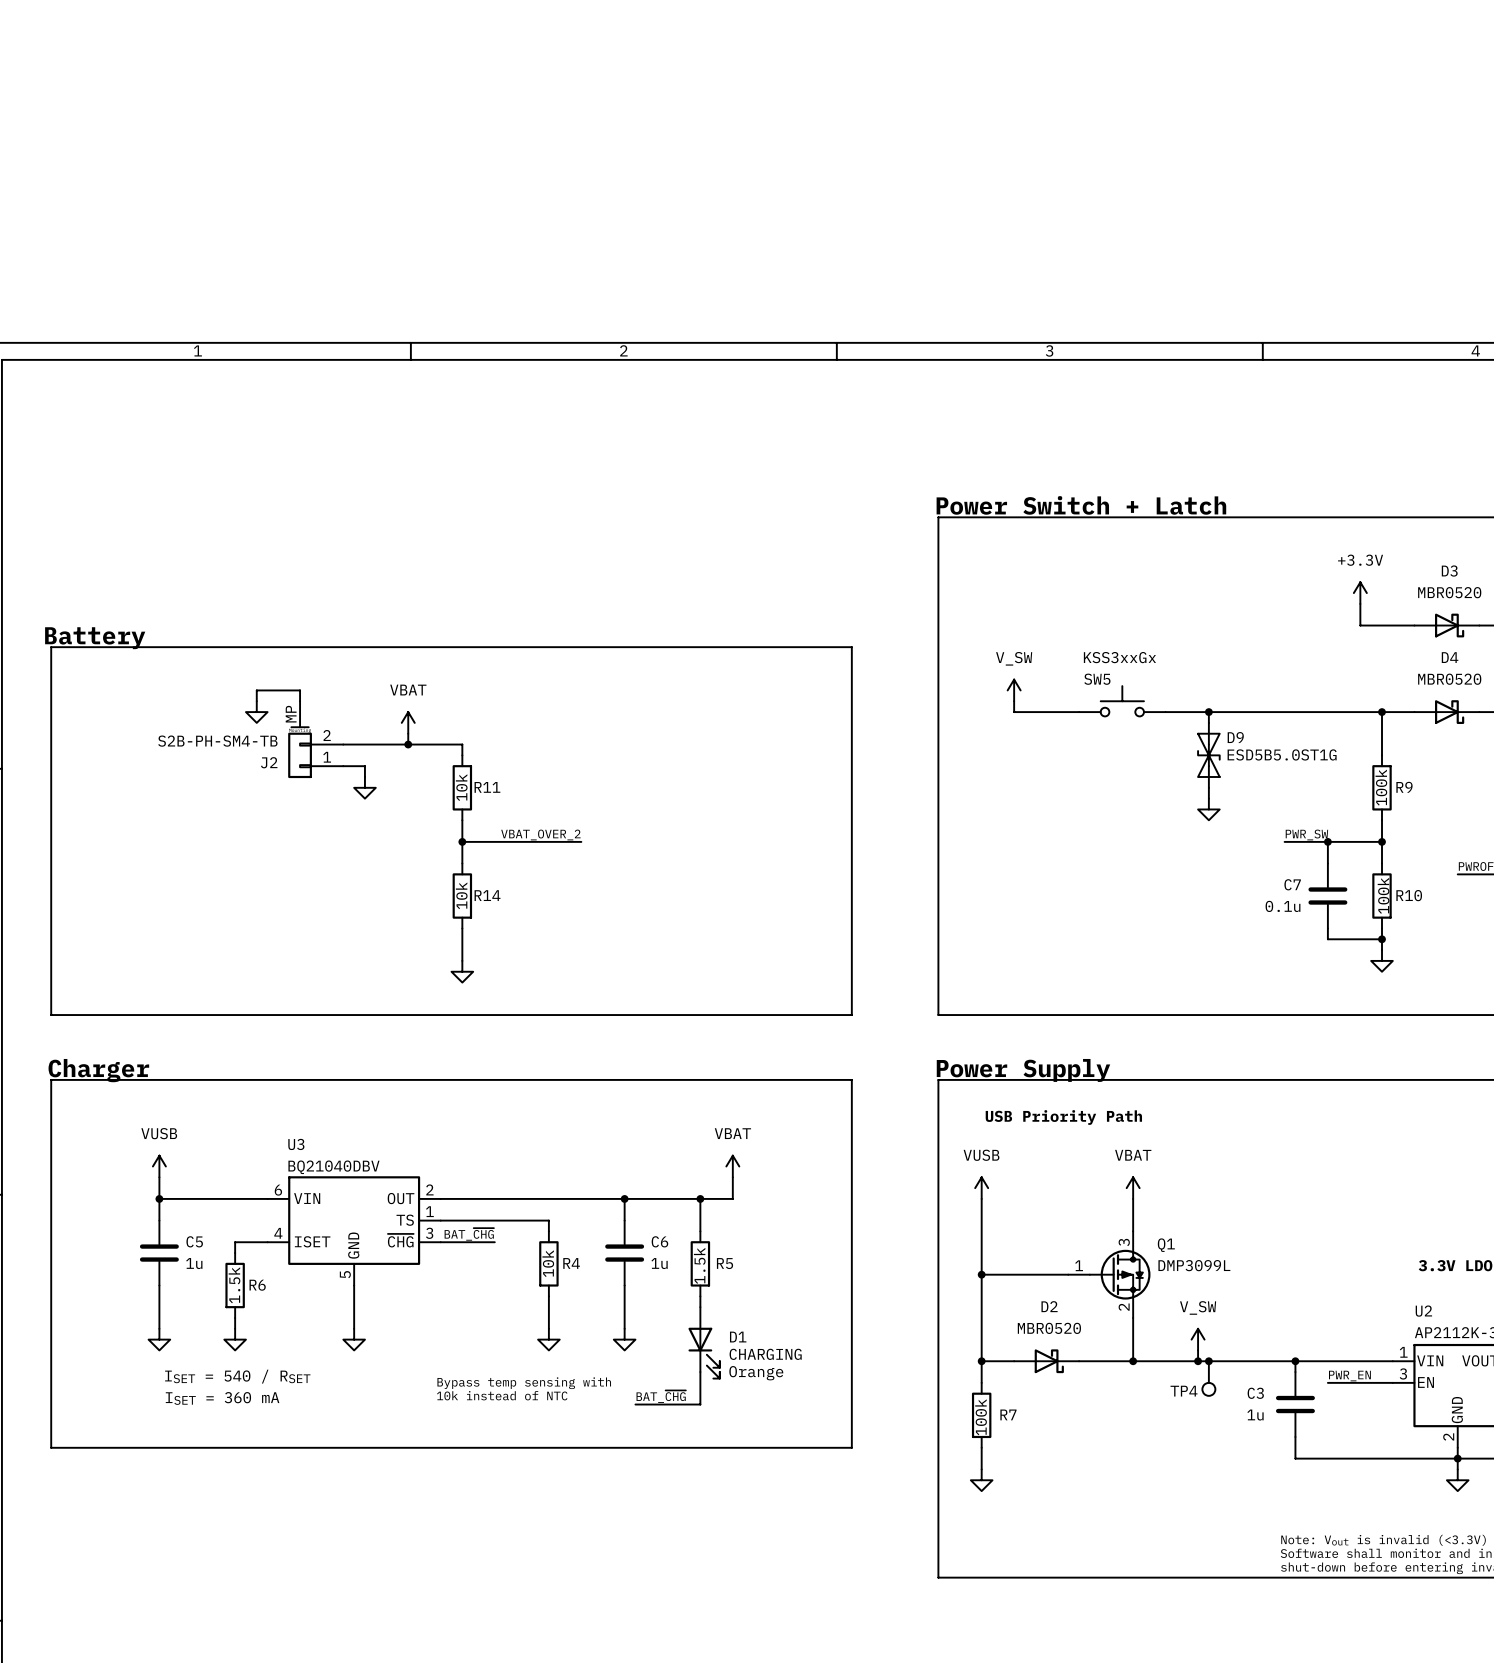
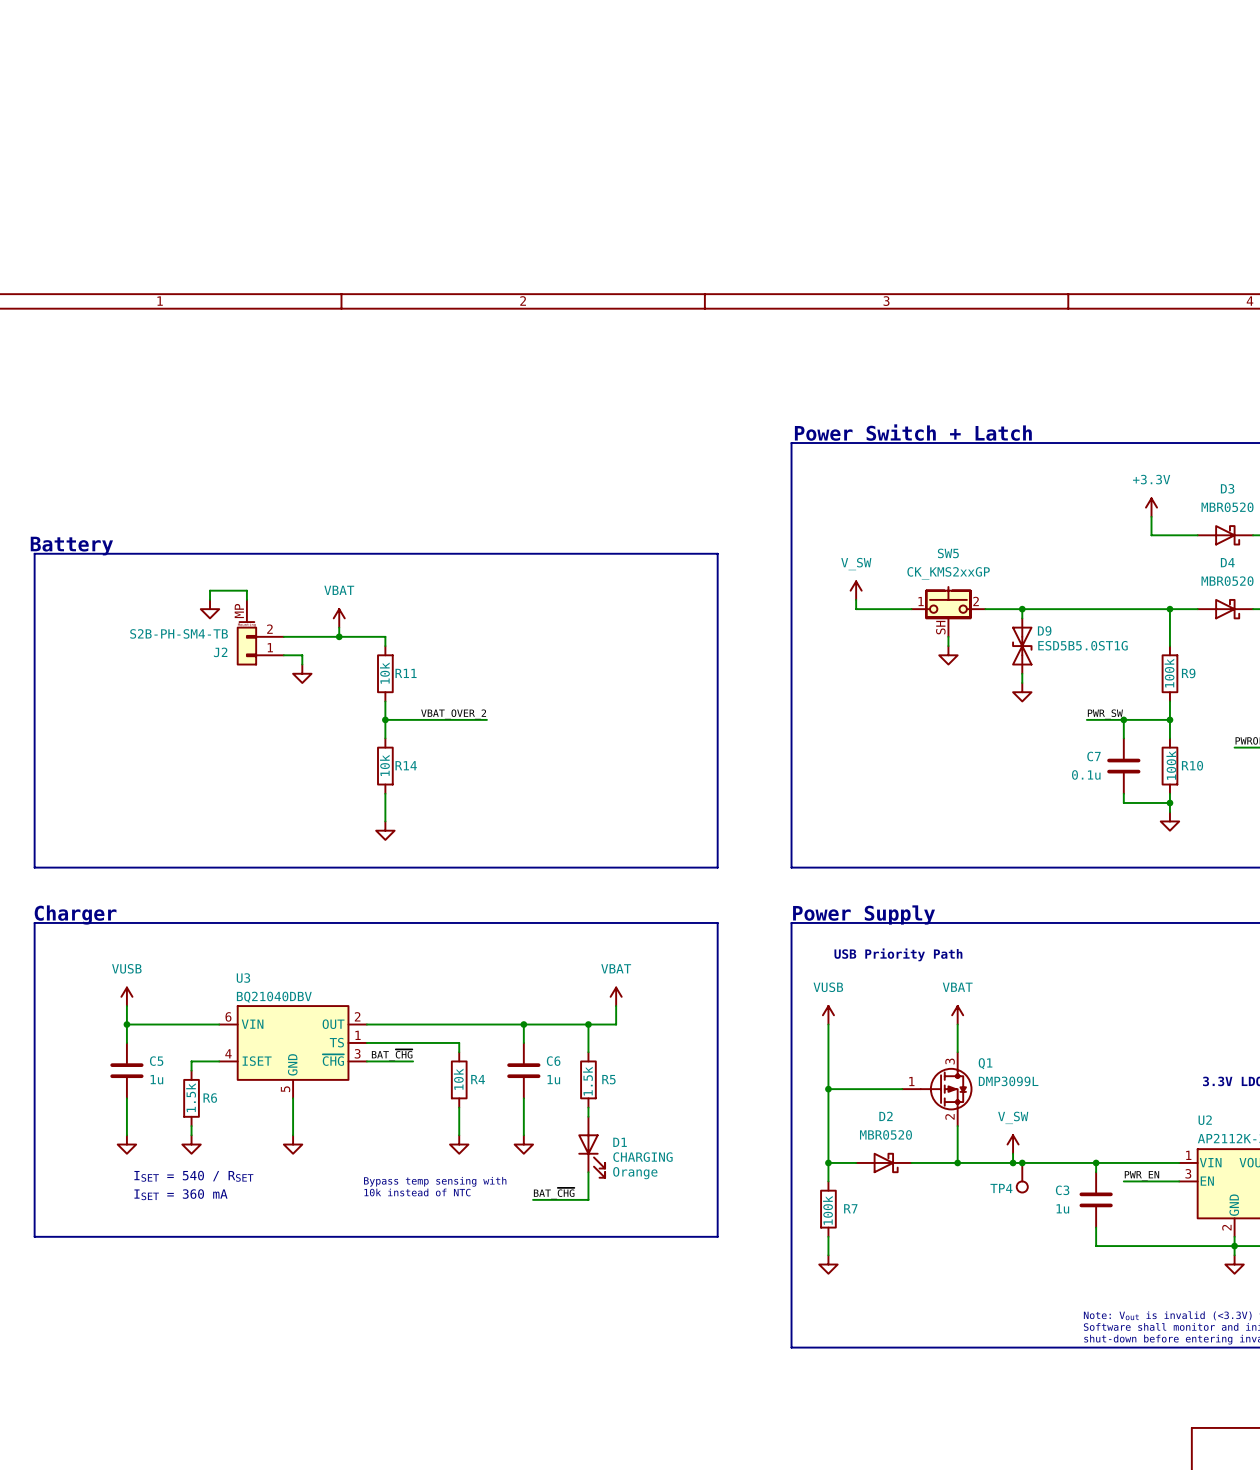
SW5 value: KSS3xxGx (1119, 657) -> CK_KMS2xxGP (948, 573)
SW5 name position: SW5 (1097, 679) -> SW5 (948, 553)
SW5 symbol: [1079, 686, 1166, 717] -> [911, 587, 986, 637]
wire: none -> (948, 636) (948, 646)
power symbol: none -> (948, 655)

